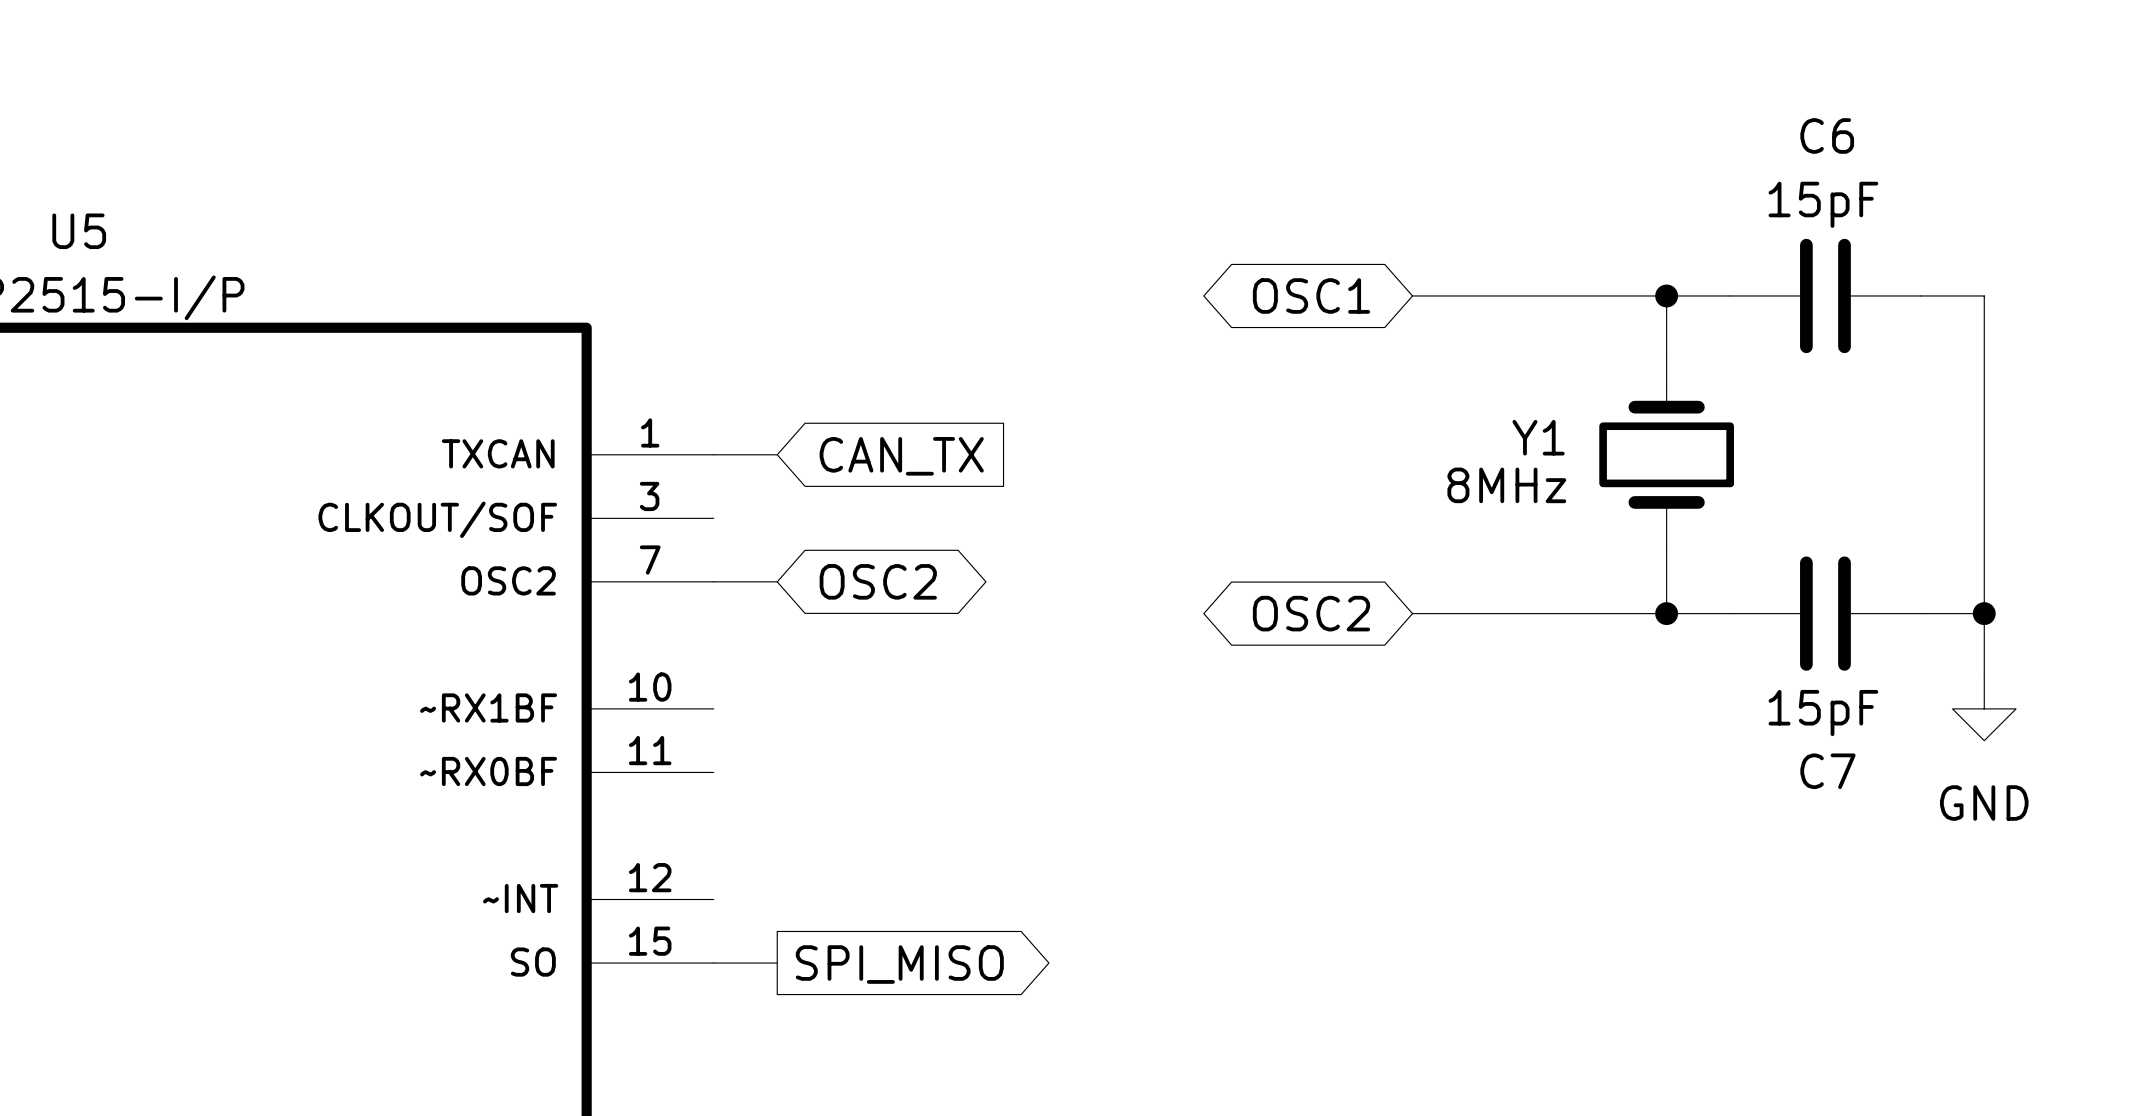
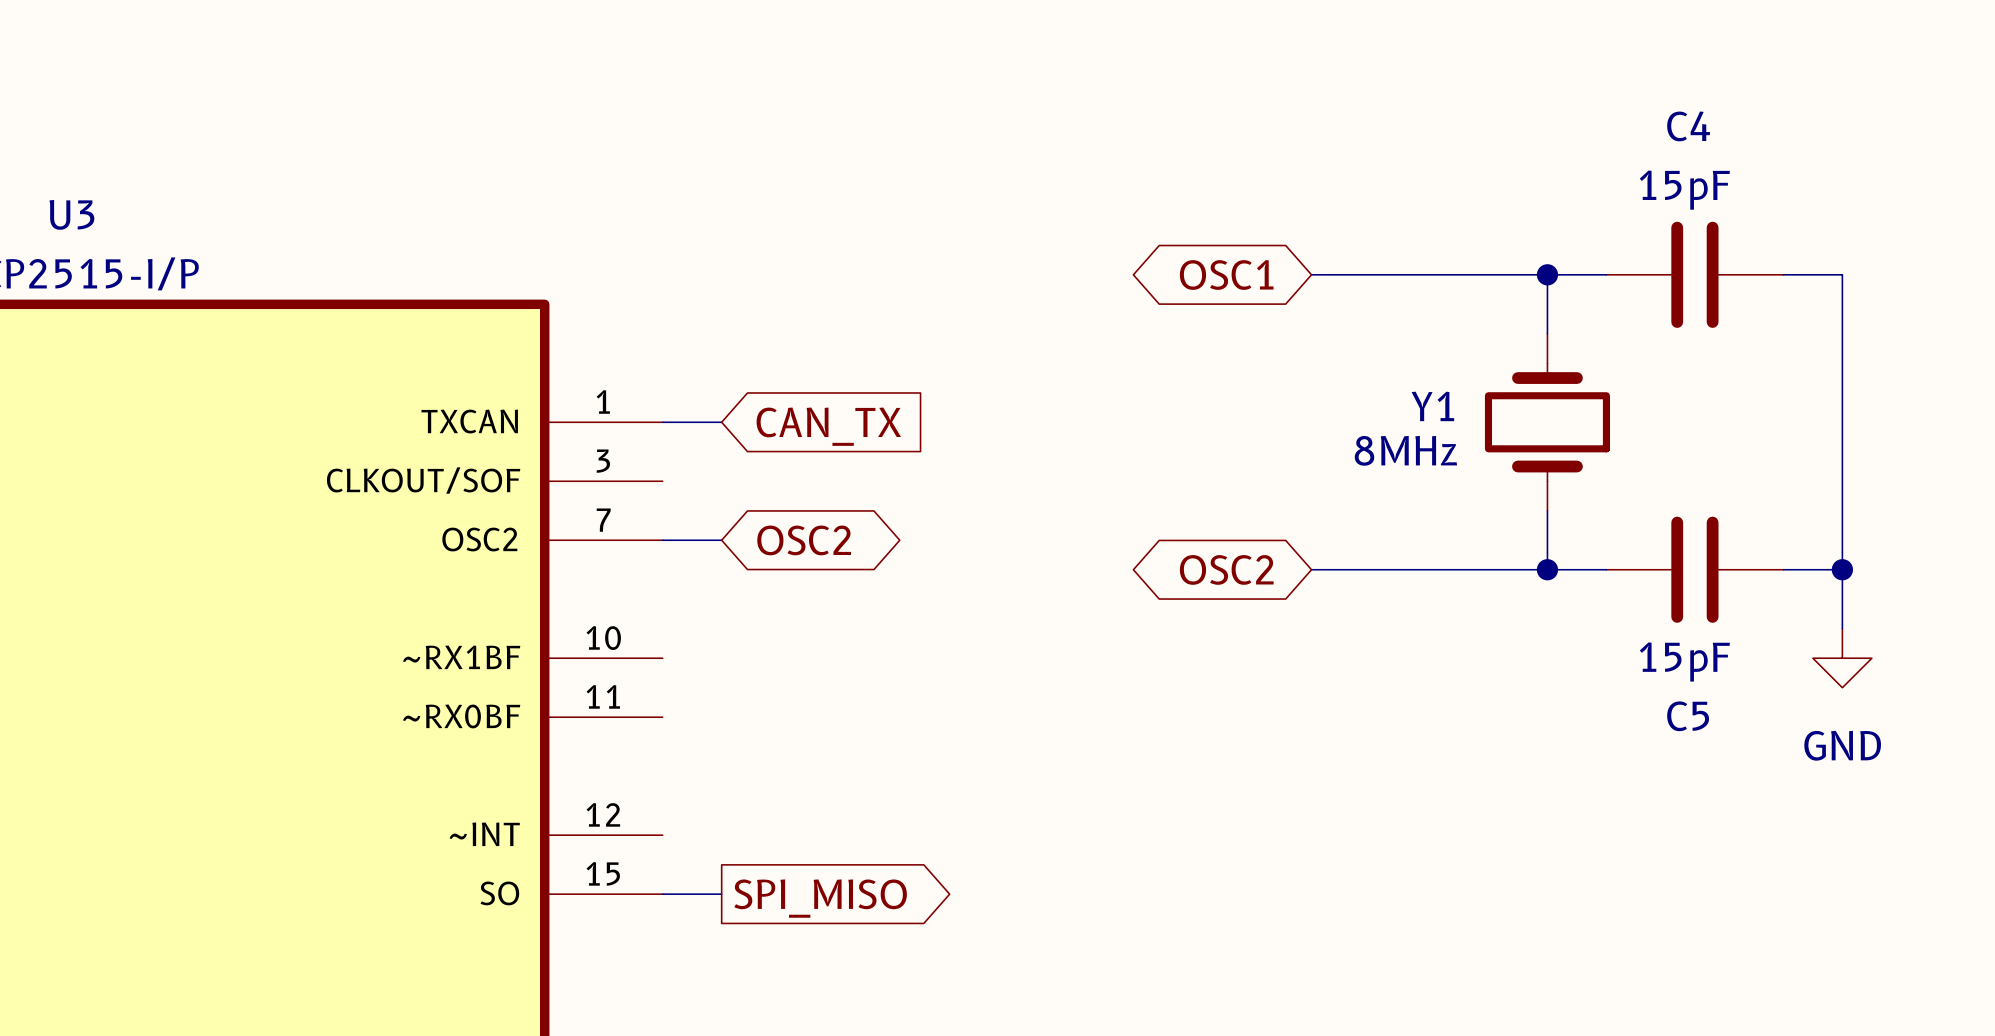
C6 name: C6 (1827, 135) -> C4 (1688, 126)
U5 name: U5 (79, 231) -> U3 (71, 214)
C7 name: C7 (1827, 771) -> C5 (1688, 716)

